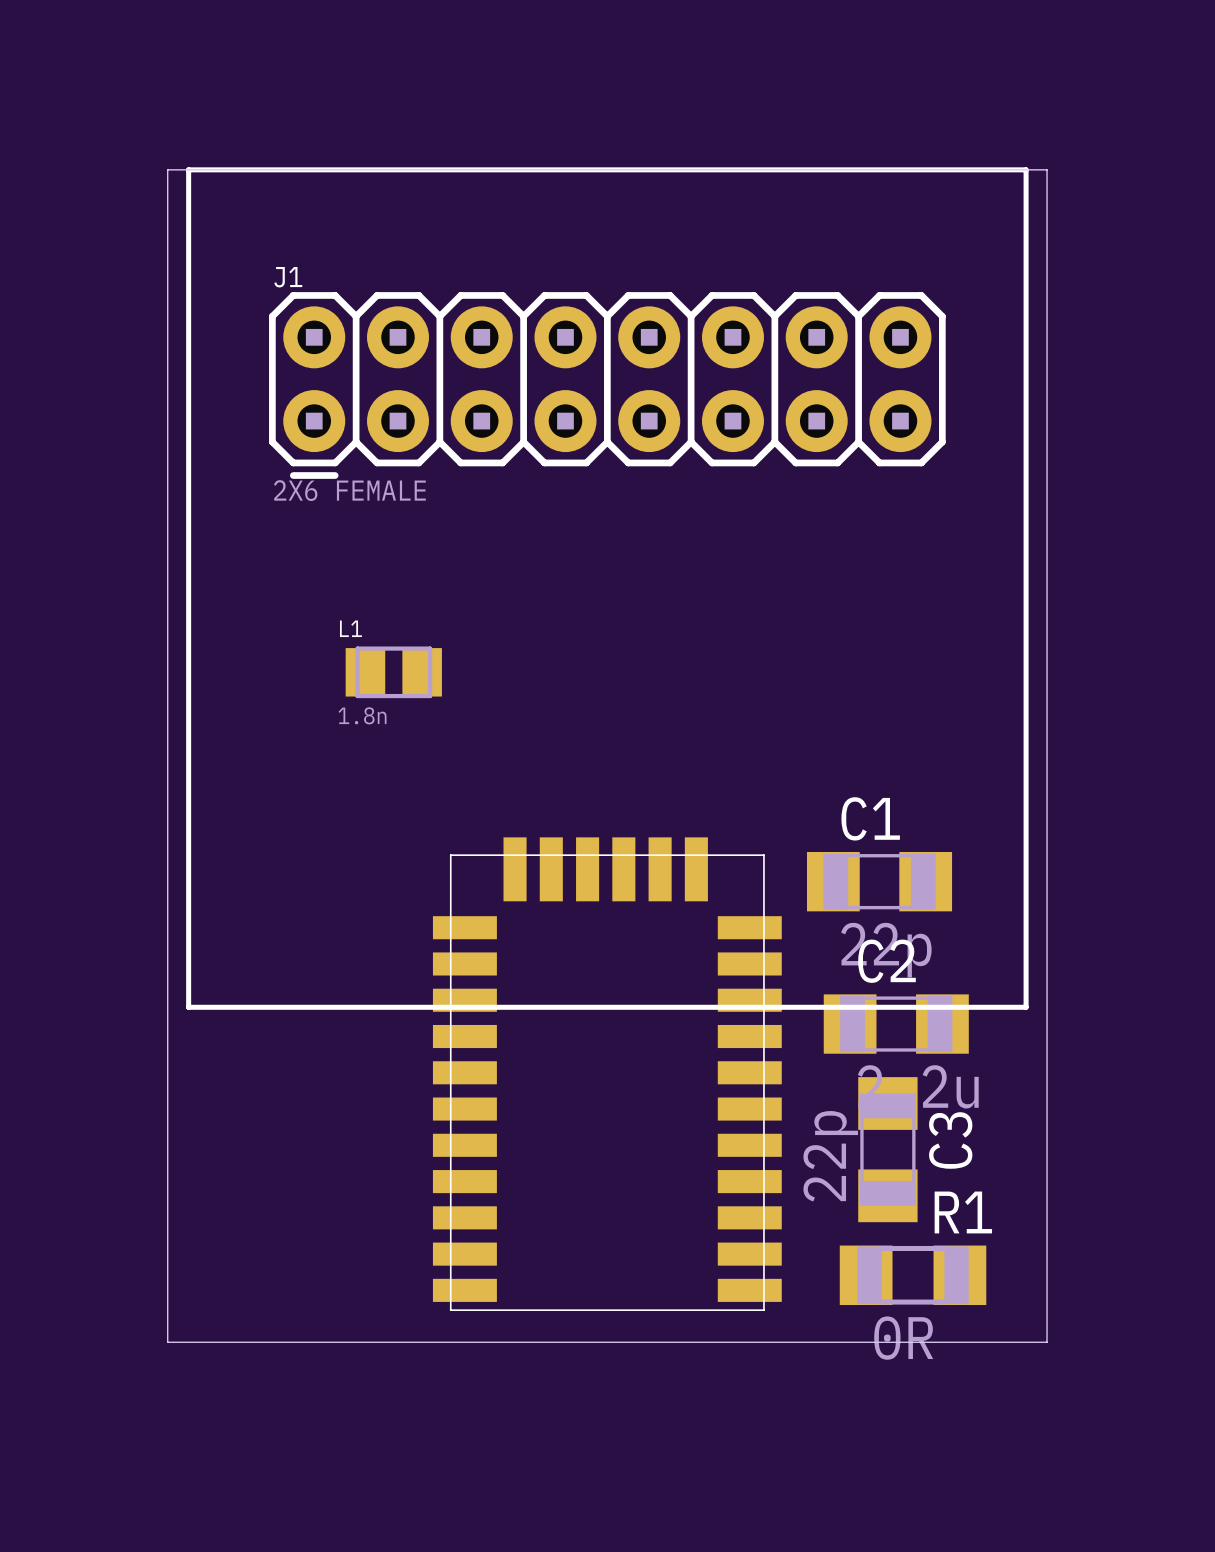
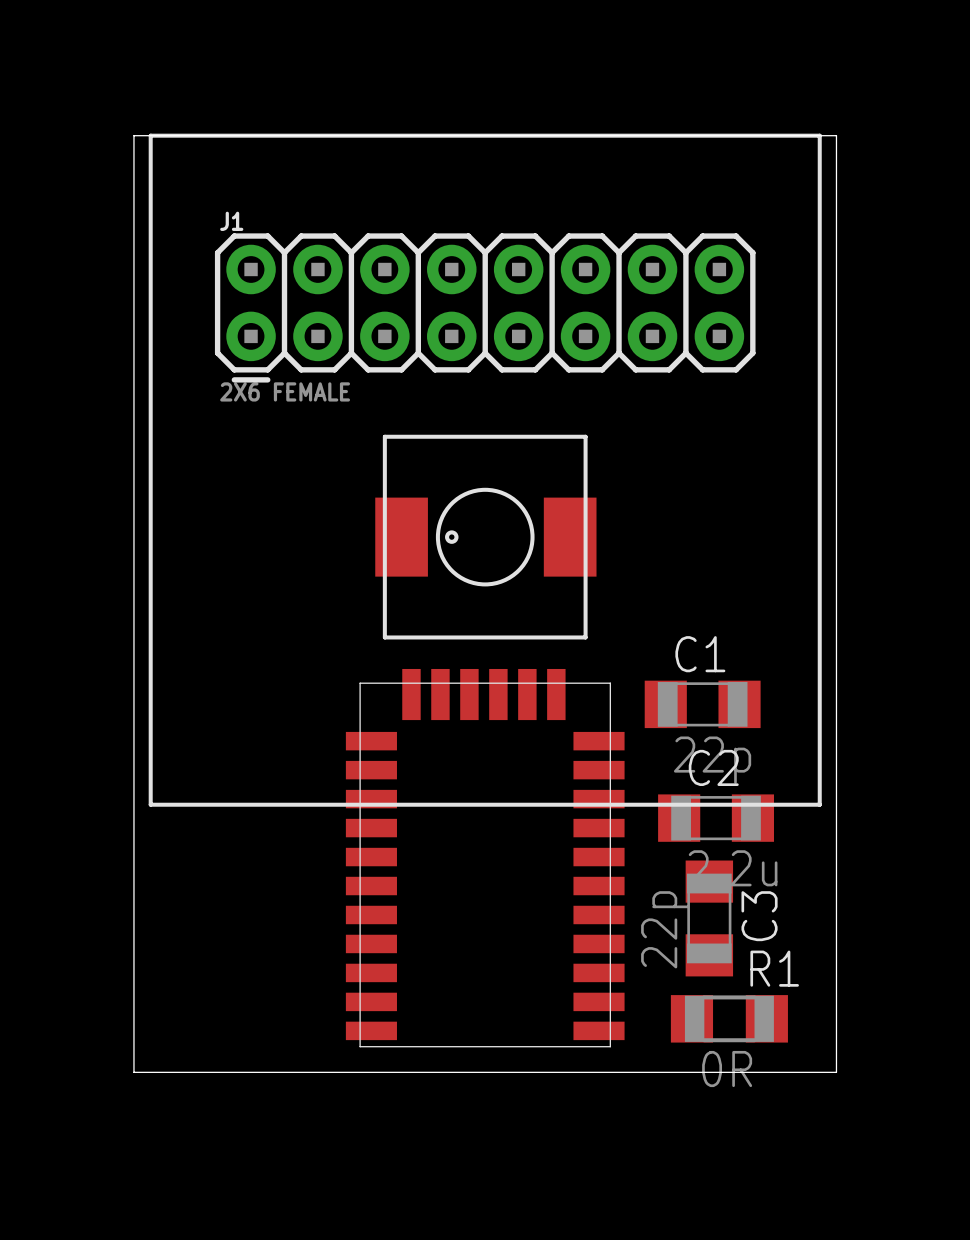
L1: 1.8n (393, 672) -> none
part: none -> (485, 537)

